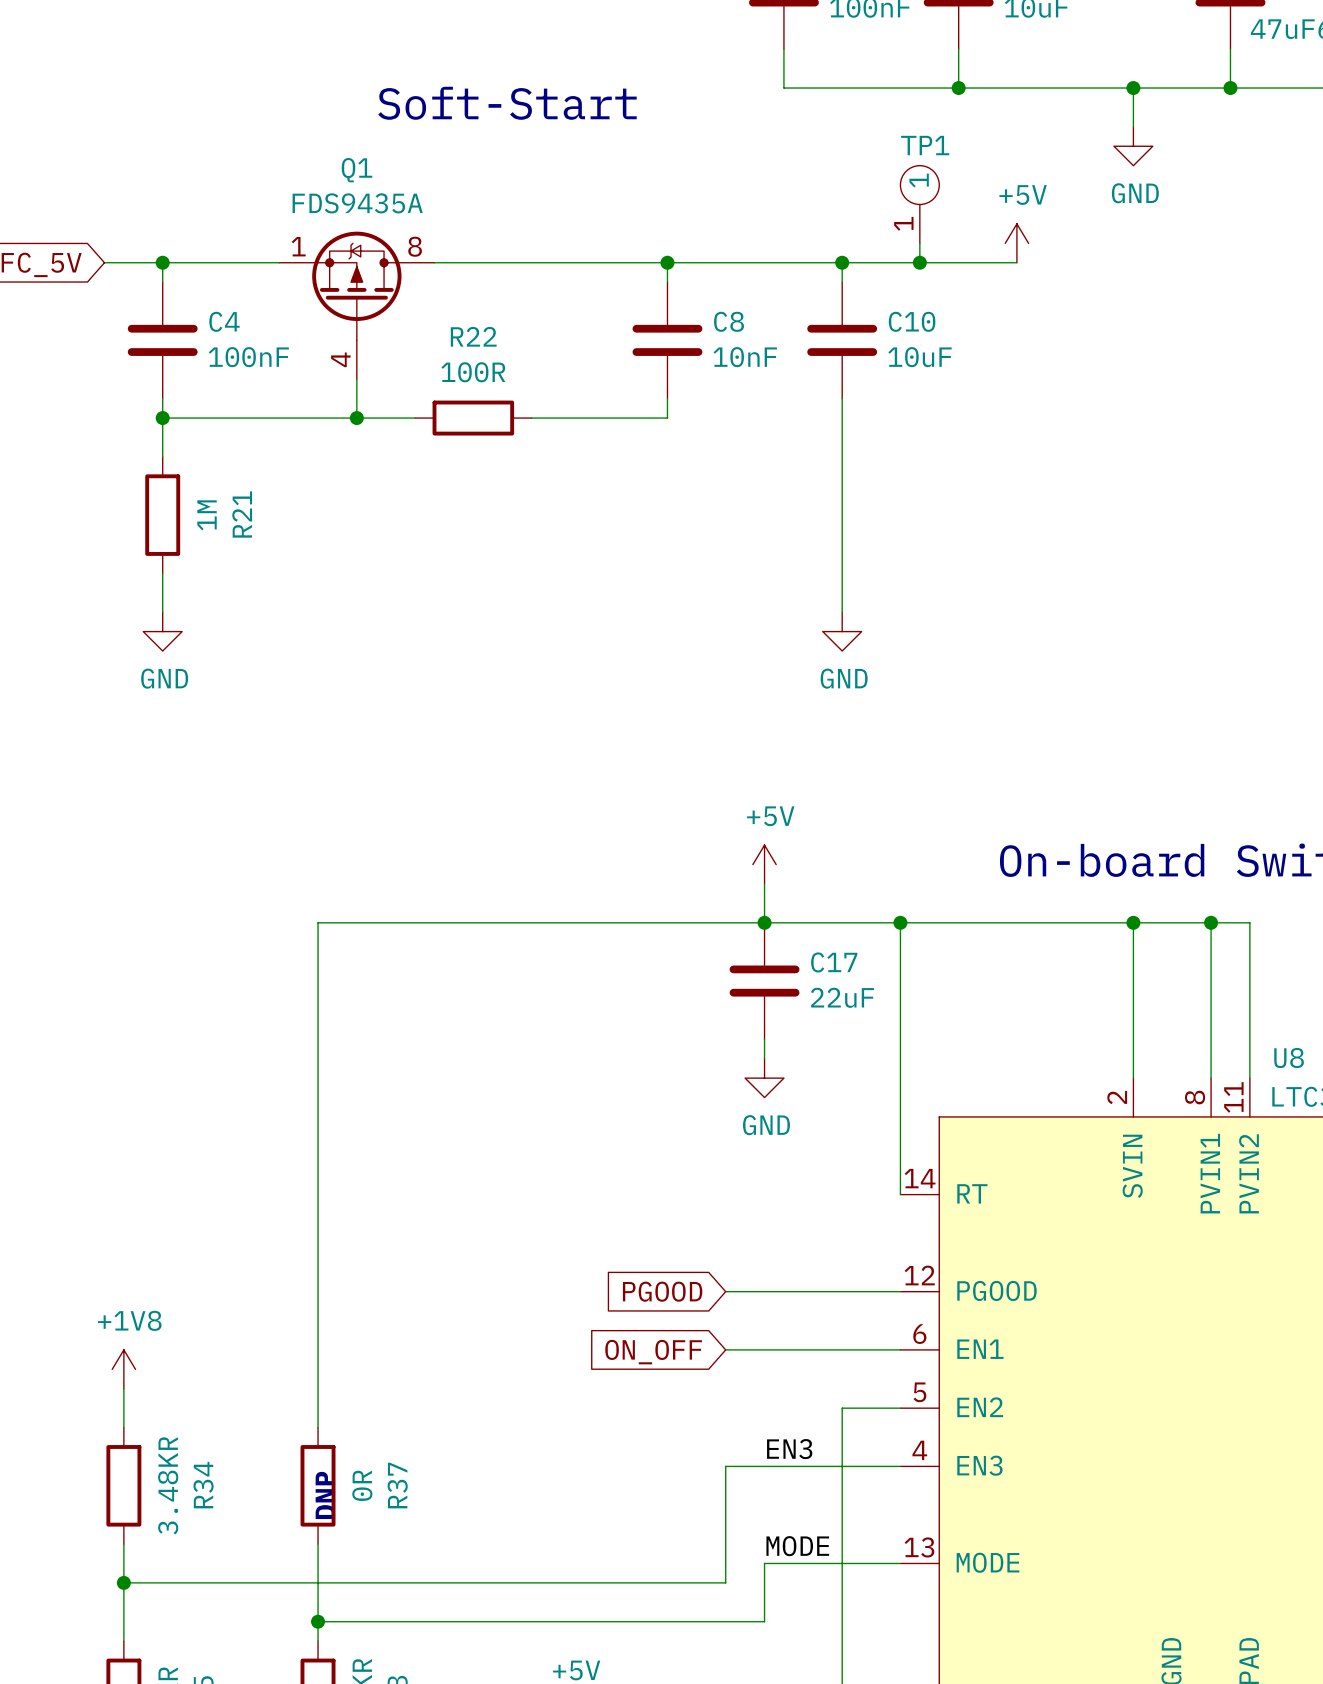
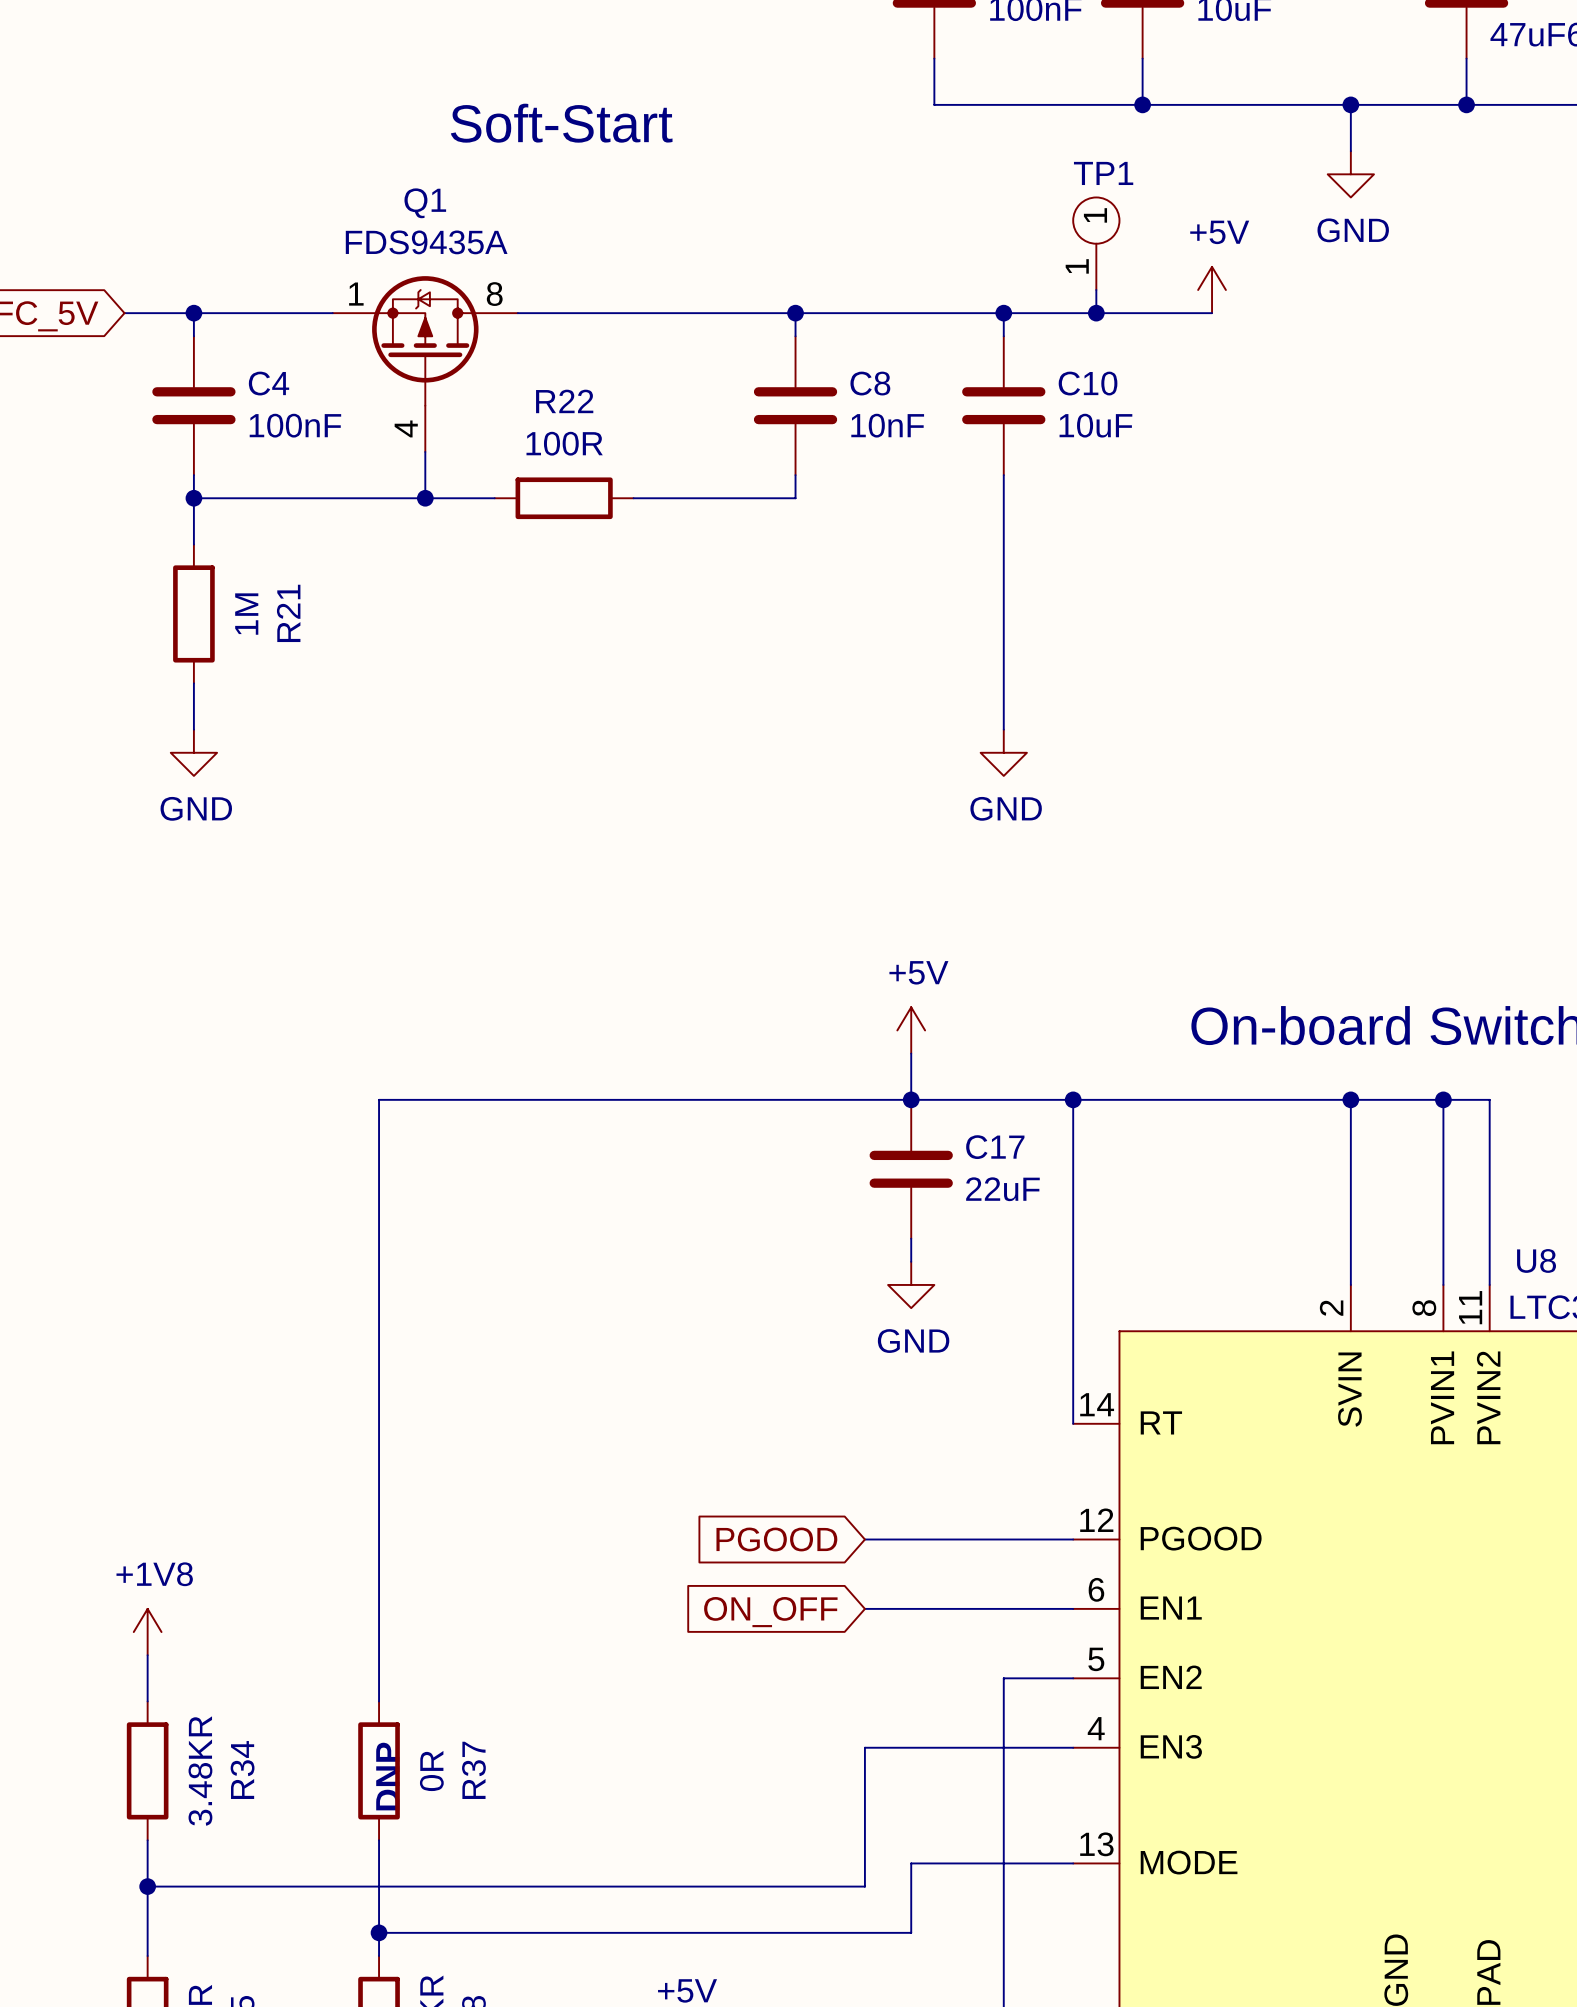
label: EN3 (789, 1449) -> none
label: MODE (797, 1546) -> none

